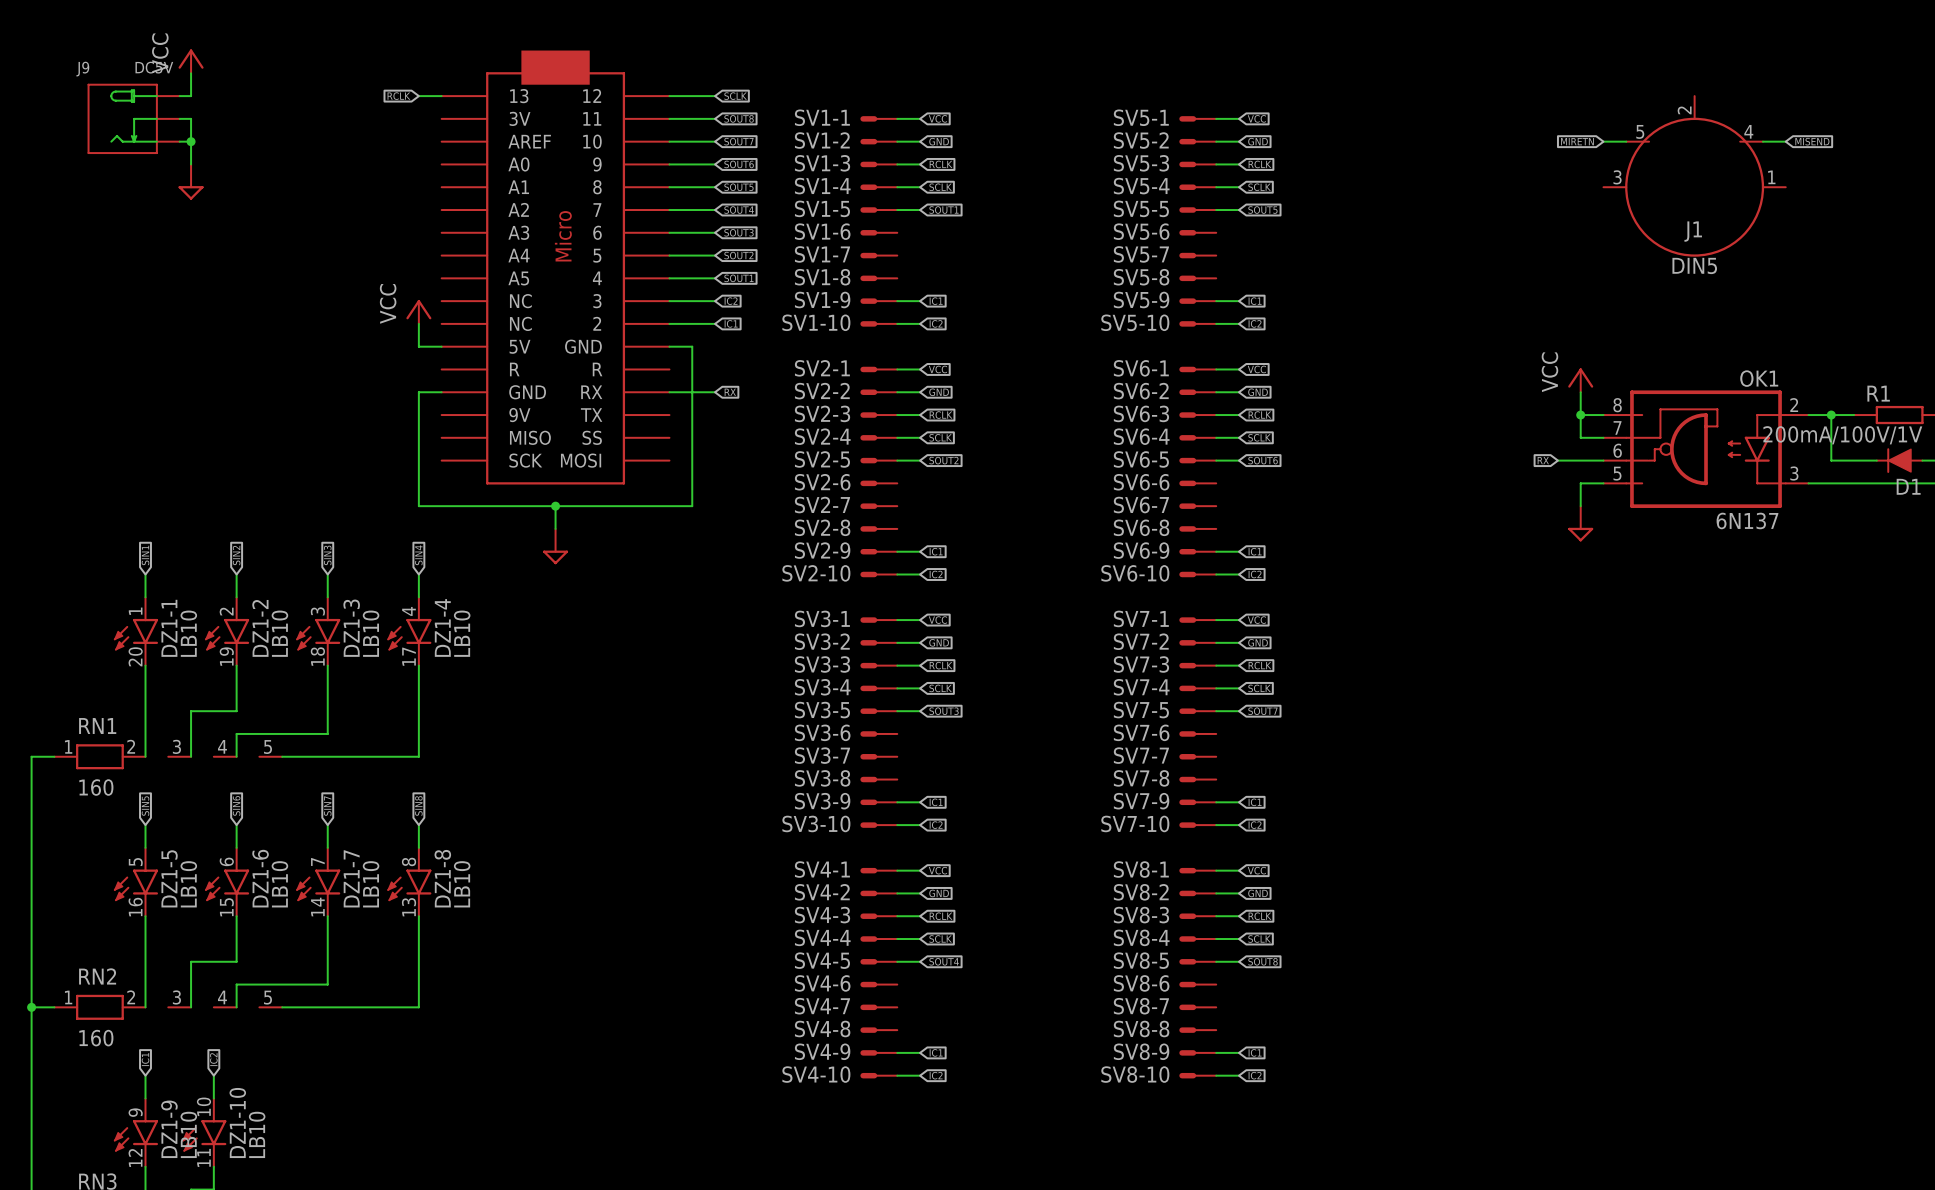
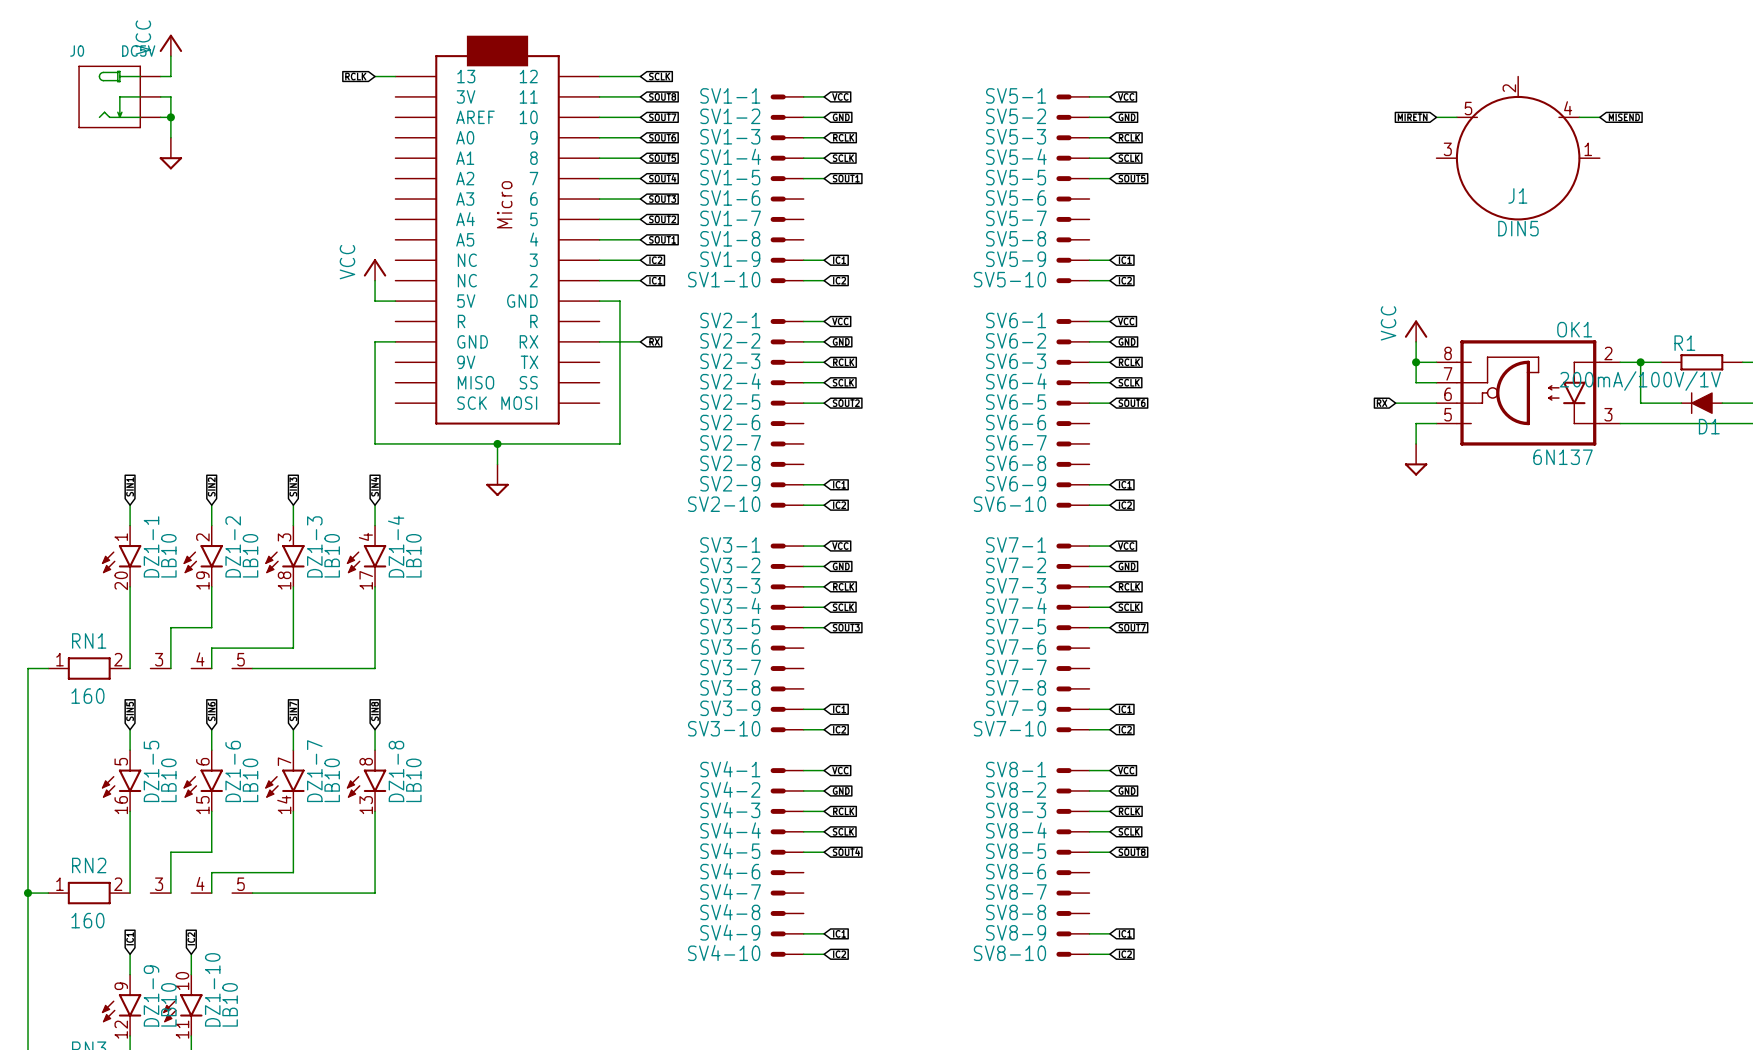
J9 name: J9 (82, 69) -> J0 (77, 51)

